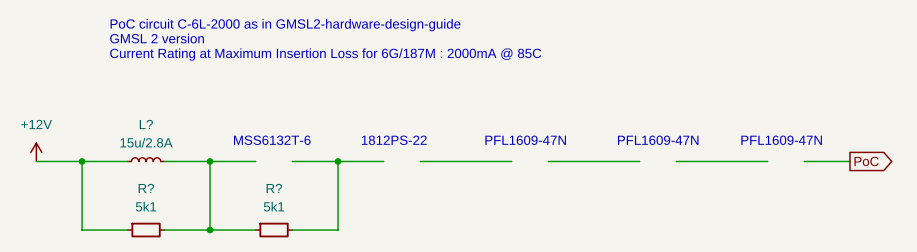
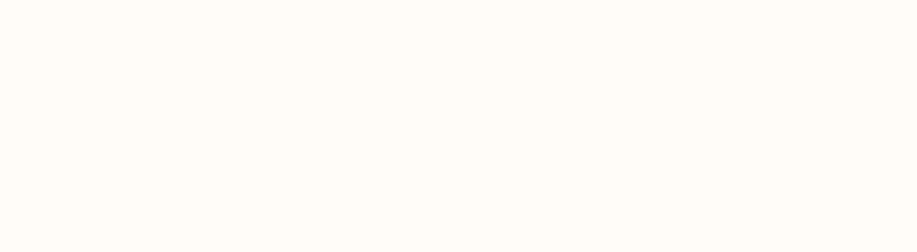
text: PoC circuit C-6L-2000 as in GMSL2-hardware-design-guide (285, 25) -> none
text: GMSL 2 version (157, 38) -> none
text: Current Rating at Maximum Insertion Loss for 6G/187M : 2000mA @ 85C (325, 54) -> none
text: MSS6132T-6 (272, 140) -> none
text: 1812PS-22 (394, 140) -> none
text: PFL1609-47N (525, 140) -> none
text: PFL1609-47N (658, 140) -> none
text: PFL1609-47N (781, 140) -> none
power symbol: +12V (36, 152) -> none
L?: (146, 159) -> none
wire: (36, 161) (127, 161) -> none
wire: (82, 161) (82, 230) (127, 230) -> none
junction: (82, 161) -> none
wire: (164, 161) (255, 161) -> none
wire: (210, 161) (210, 230) -> none
junction: (210, 161) -> none
wire: (292, 161) (383, 161) -> none
wire: (338, 161) (338, 230) (292, 230) -> none
junction: (338, 161) -> none
wire: (420, 161) (511, 161) -> none
wire: (548, 161) (639, 161) -> none
wire: (676, 161) (767, 161) -> none
wire: (804, 161) (849, 161) -> none
global label: PoC (866, 161) -> none
R?: (146, 230) -> none
wire: (164, 230) (255, 230) -> none
junction: (210, 230) -> none
R?: (274, 230) -> none

